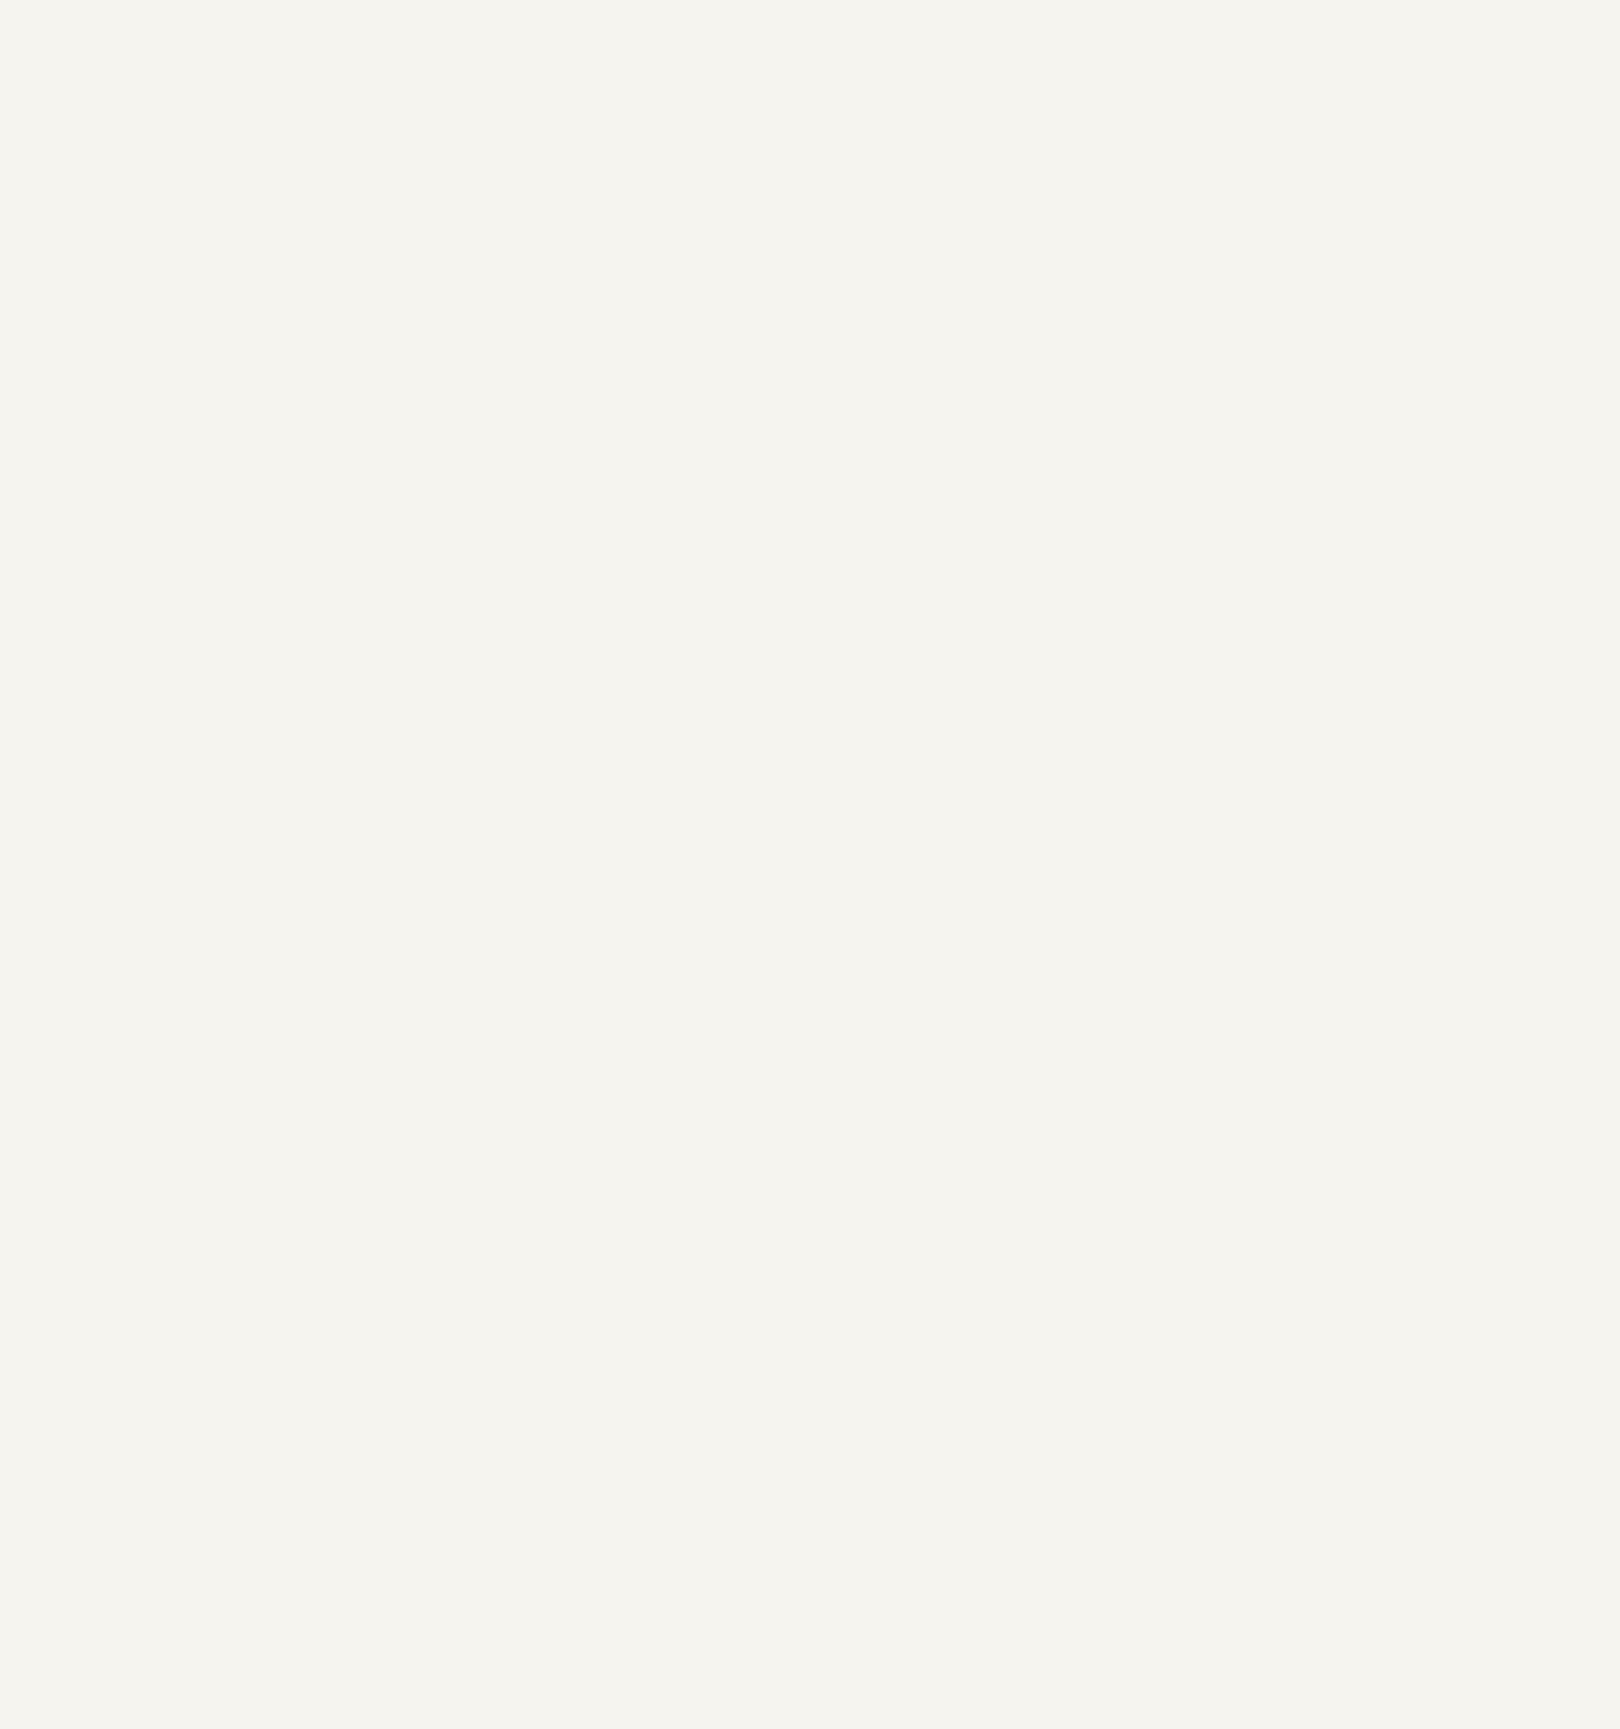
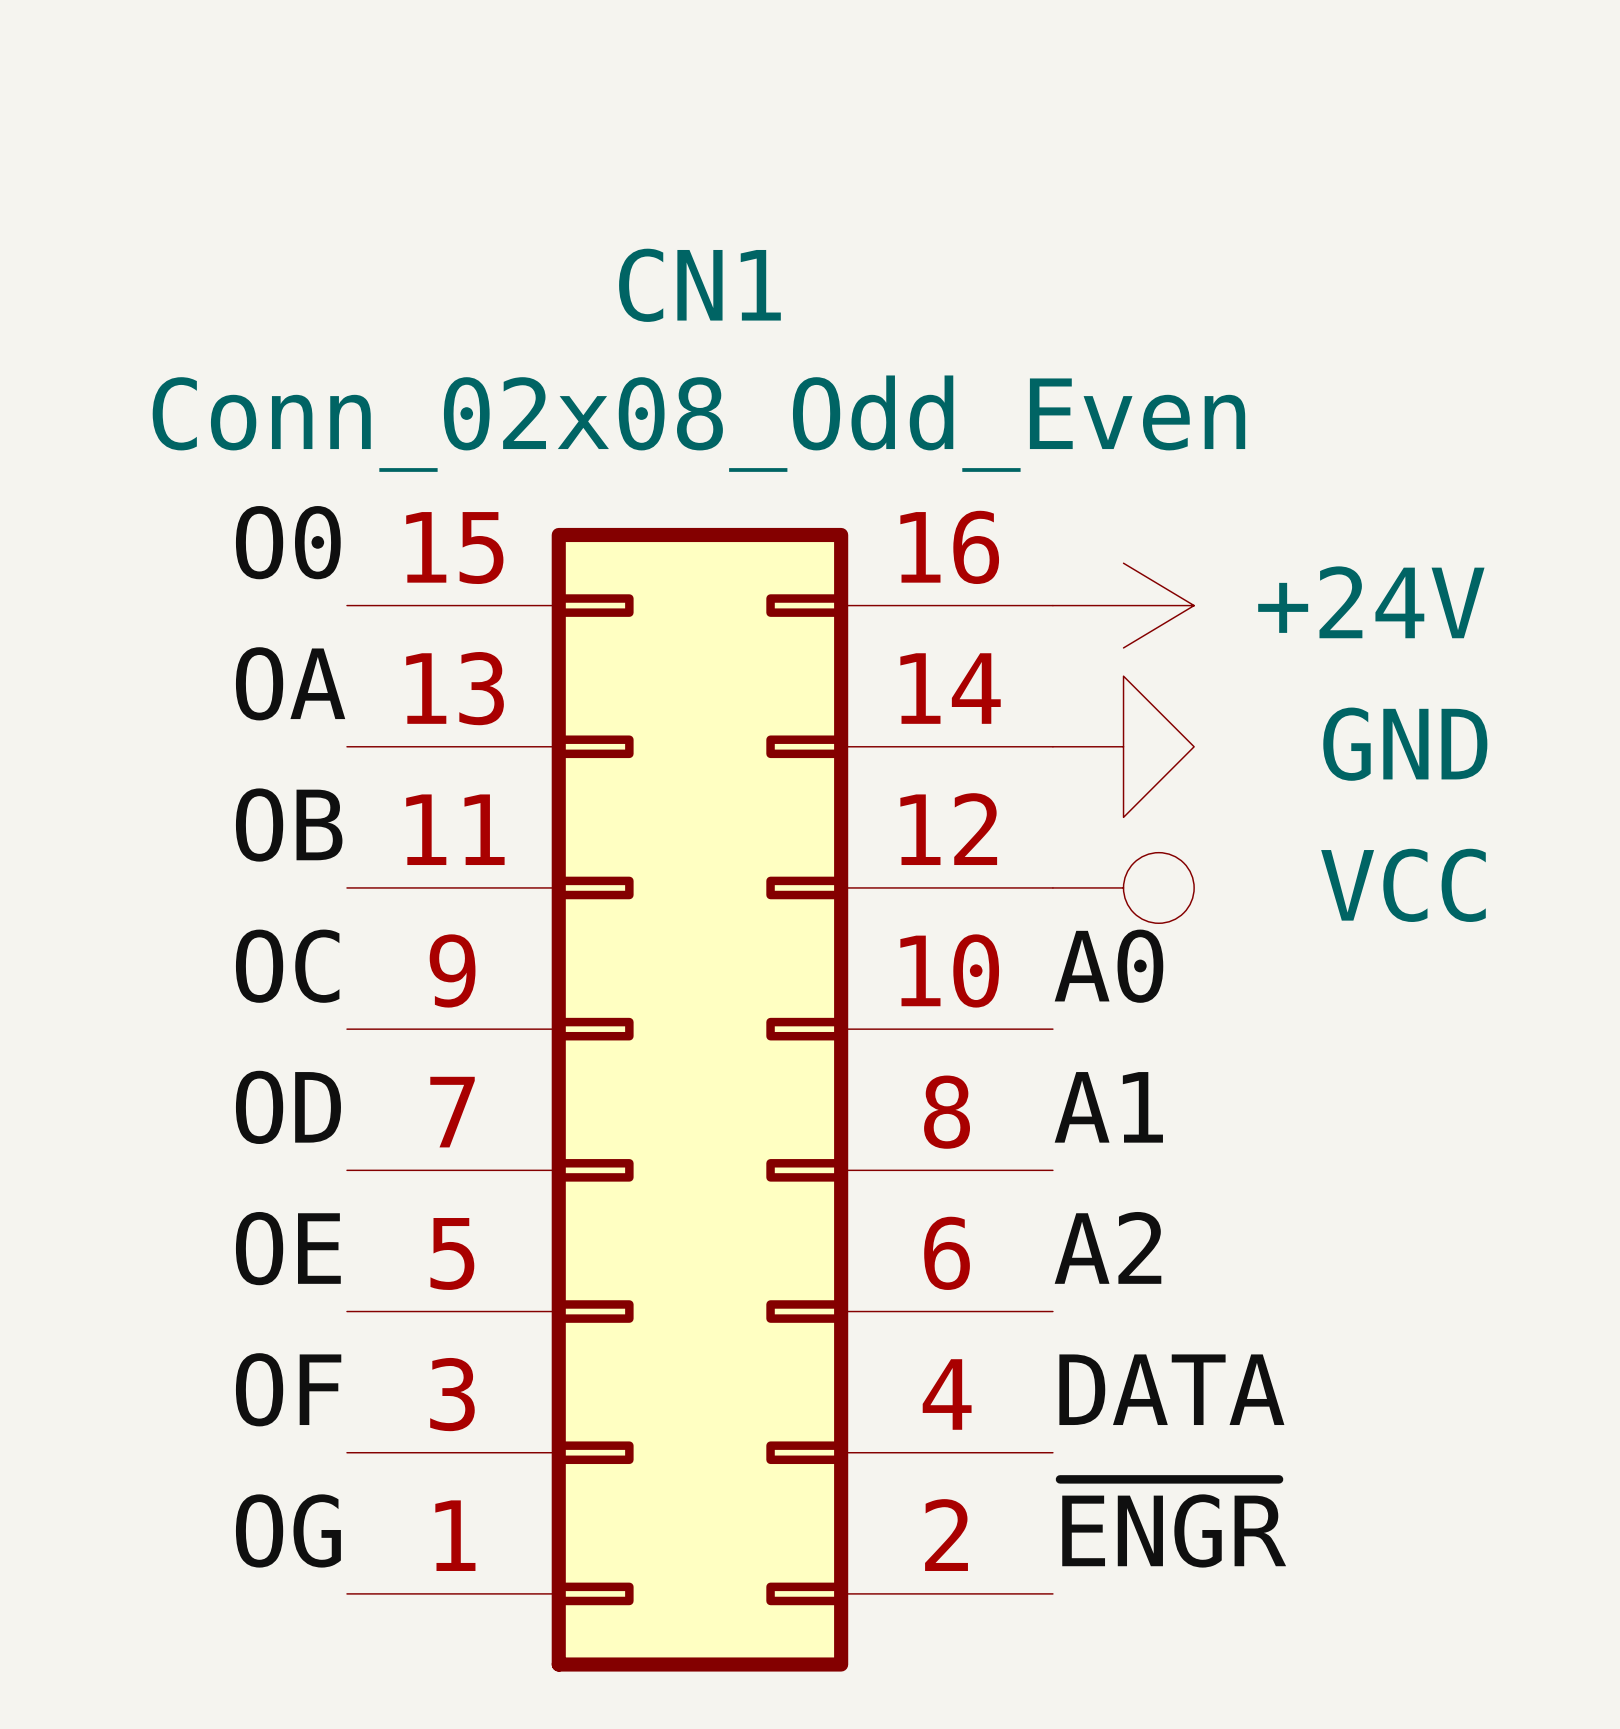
label: none -> O0 (288, 542)
power symbol: none -> +24V (1123, 605)
label: none -> OA (290, 683)
power symbol: none -> GND (1123, 746)
label: none -> OB (289, 825)
power symbol: none -> VCC (1123, 887)
label: none -> OC (287, 966)
label: none -> A0 (1108, 966)
CN1: none -> Conn_02x08_Odd_Even (699, 1099)
label: none -> OD (288, 1107)
label: none -> A1 (1108, 1107)
label: none -> A2 (1107, 1247)
label: none -> OE (288, 1248)
label: none -> OF (288, 1389)
label: none -> DATA (1171, 1389)
label: none -> ~{ENGR} (1173, 1523)
label: none -> OG (288, 1530)

